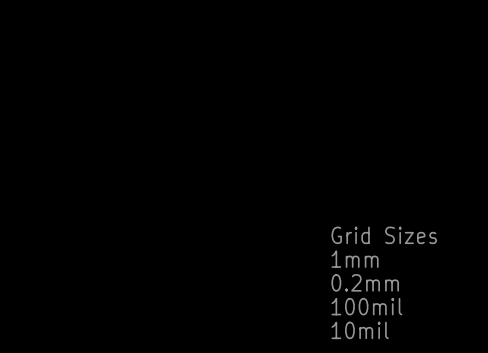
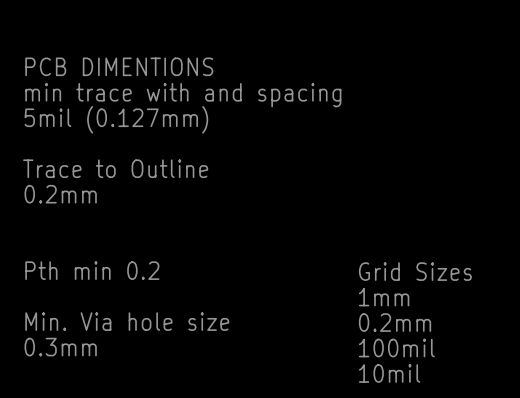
text: none -> PCB DIMENTIONS (119, 66)
text: none -> min trace with and spacing (183, 95)
text: none -> 5mil (0.127mm) (116, 119)
text: none -> Trace to Outline (115, 168)
text: none -> 0.2mm (60, 194)
text: none -> Pth min 0.2 (92, 270)
text: none -> Min. Via hole size (127, 321)
text: none -> 0.3mm (60, 347)

